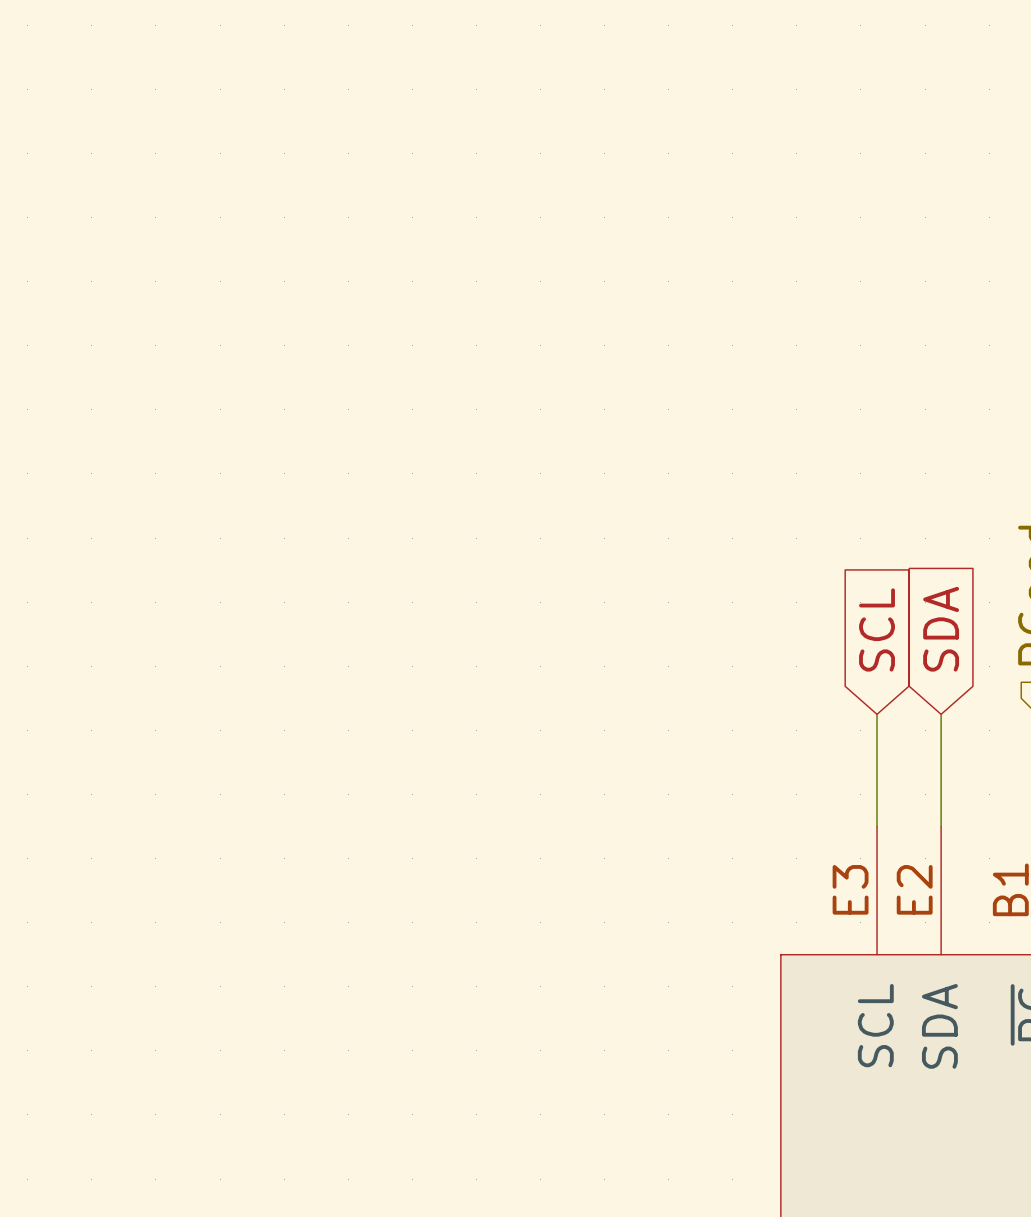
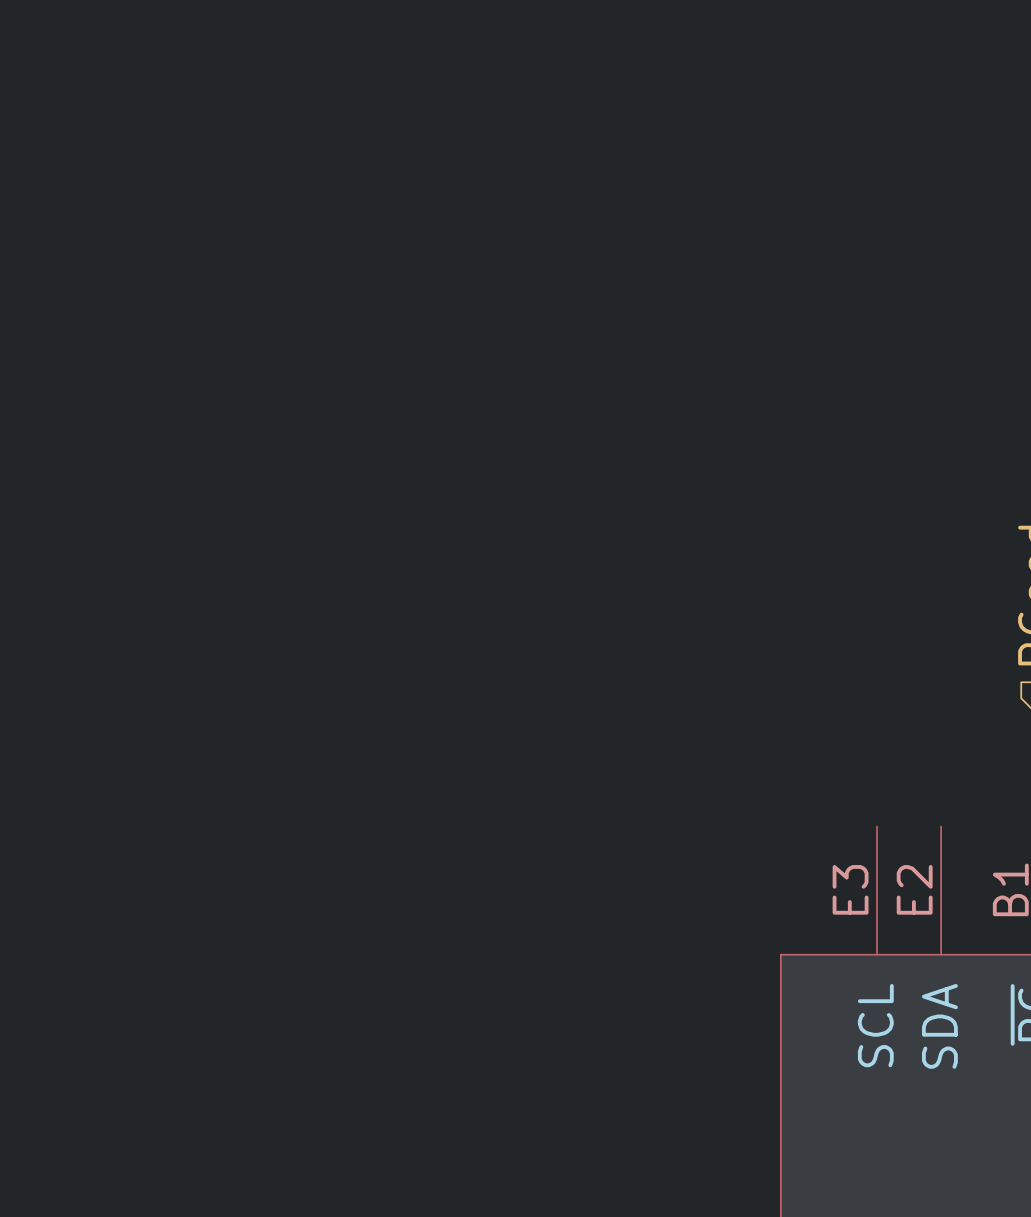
global label: SCL (877, 629) -> none
global label: SDA (941, 629) -> none
wire: (877, 714) (877, 826) -> none
wire: (941, 714) (941, 826) -> none

